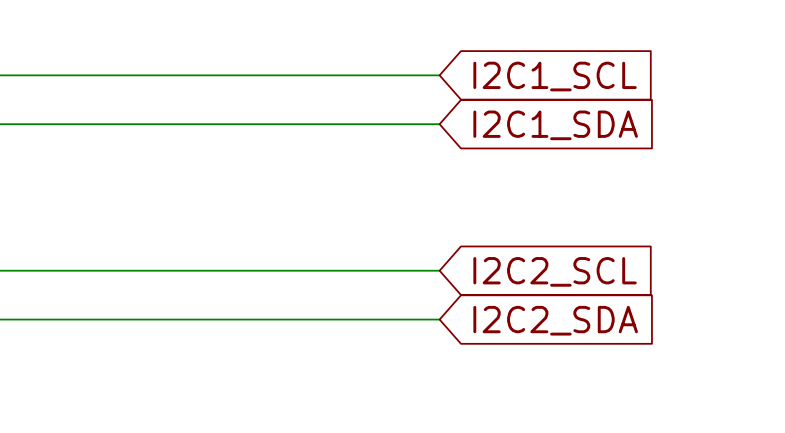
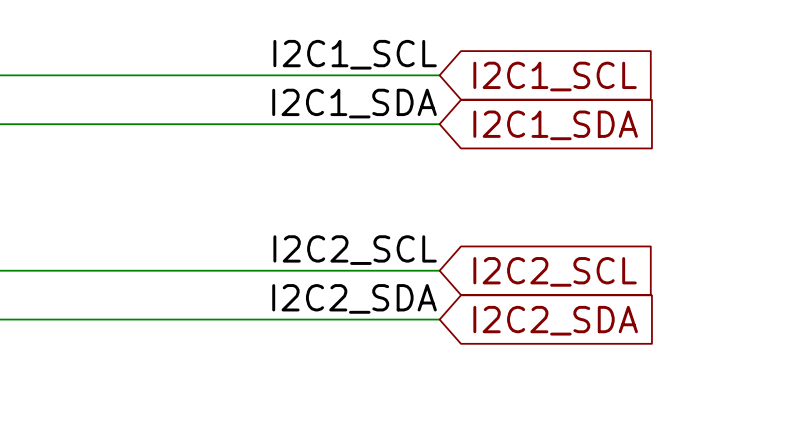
label: none -> I2C1_SCL (355, 54)
label: none -> I2C1_SDA (354, 103)
label: none -> I2C2_SCL (355, 250)
label: none -> I2C2_SDA (354, 298)

